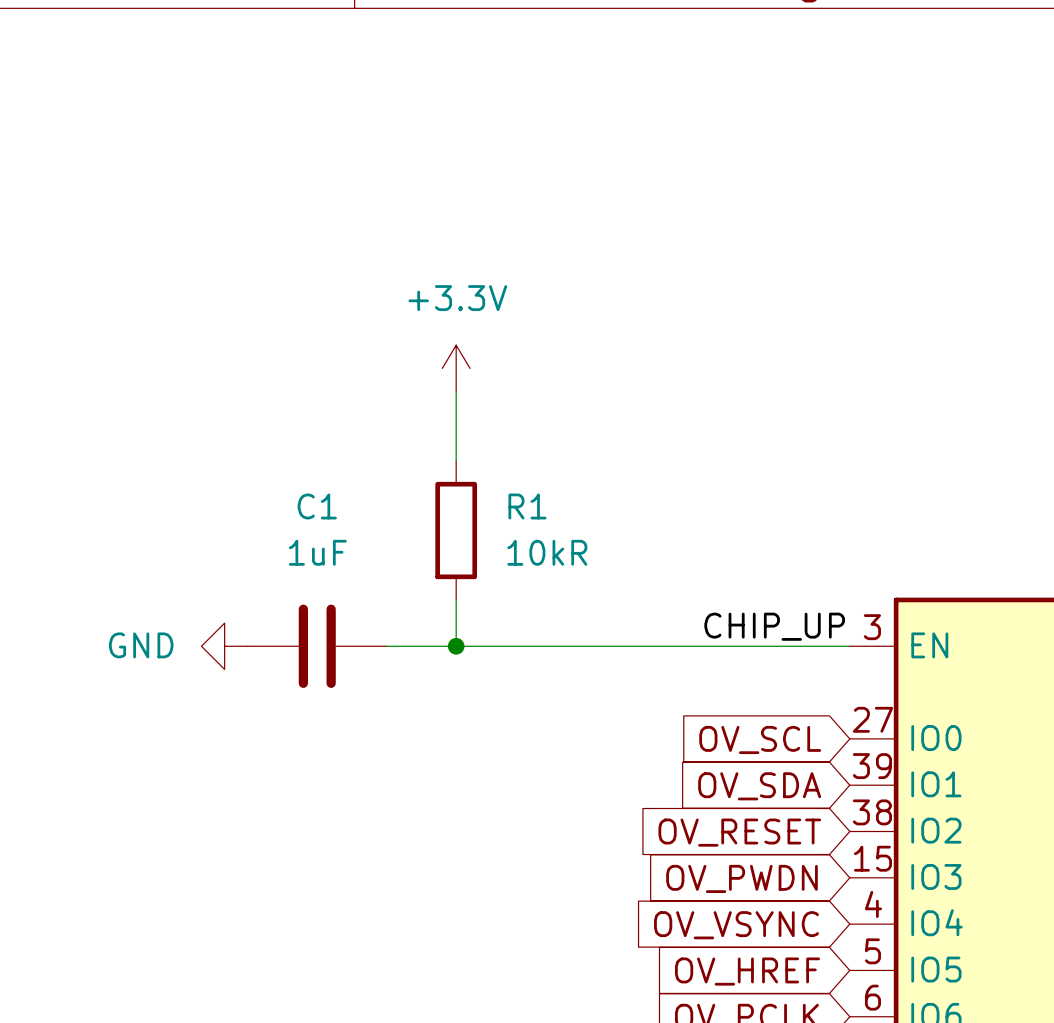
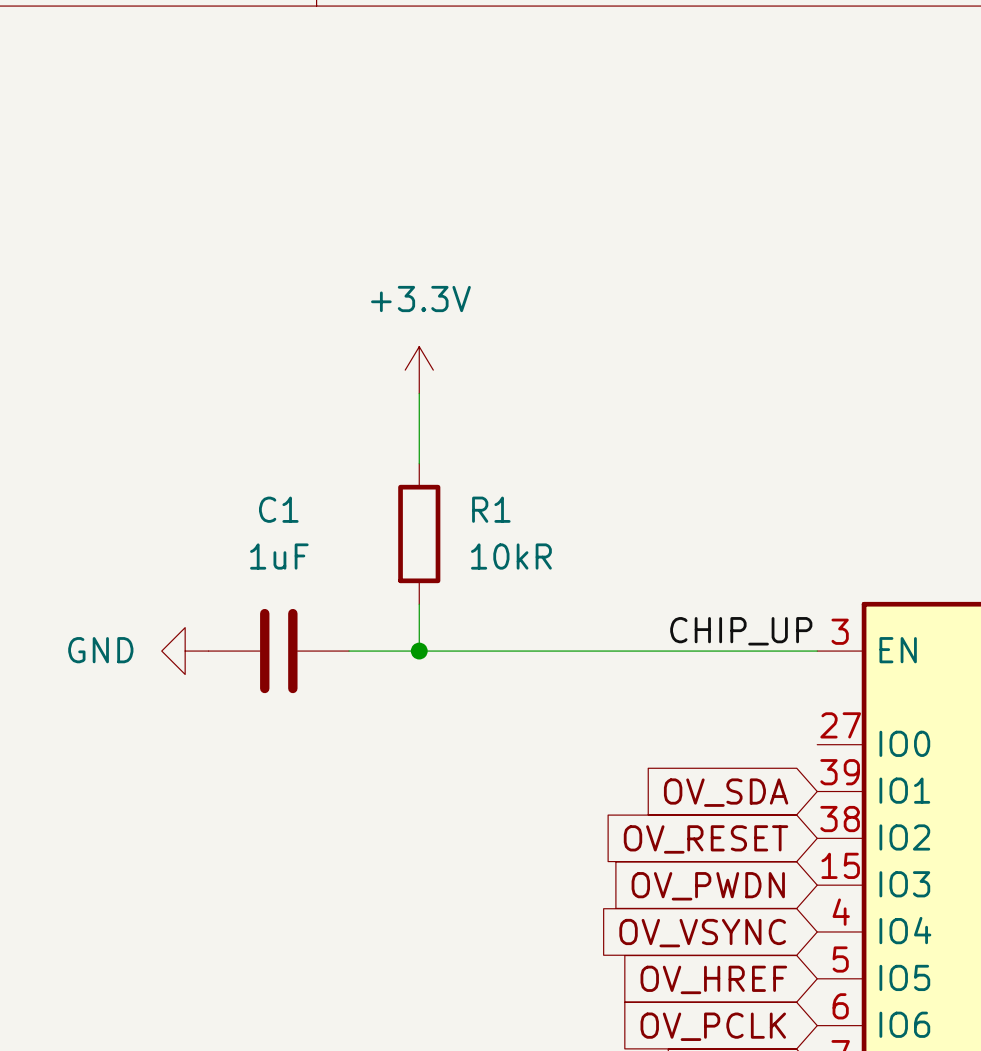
global label: OV_SCL (760, 739) -> none

